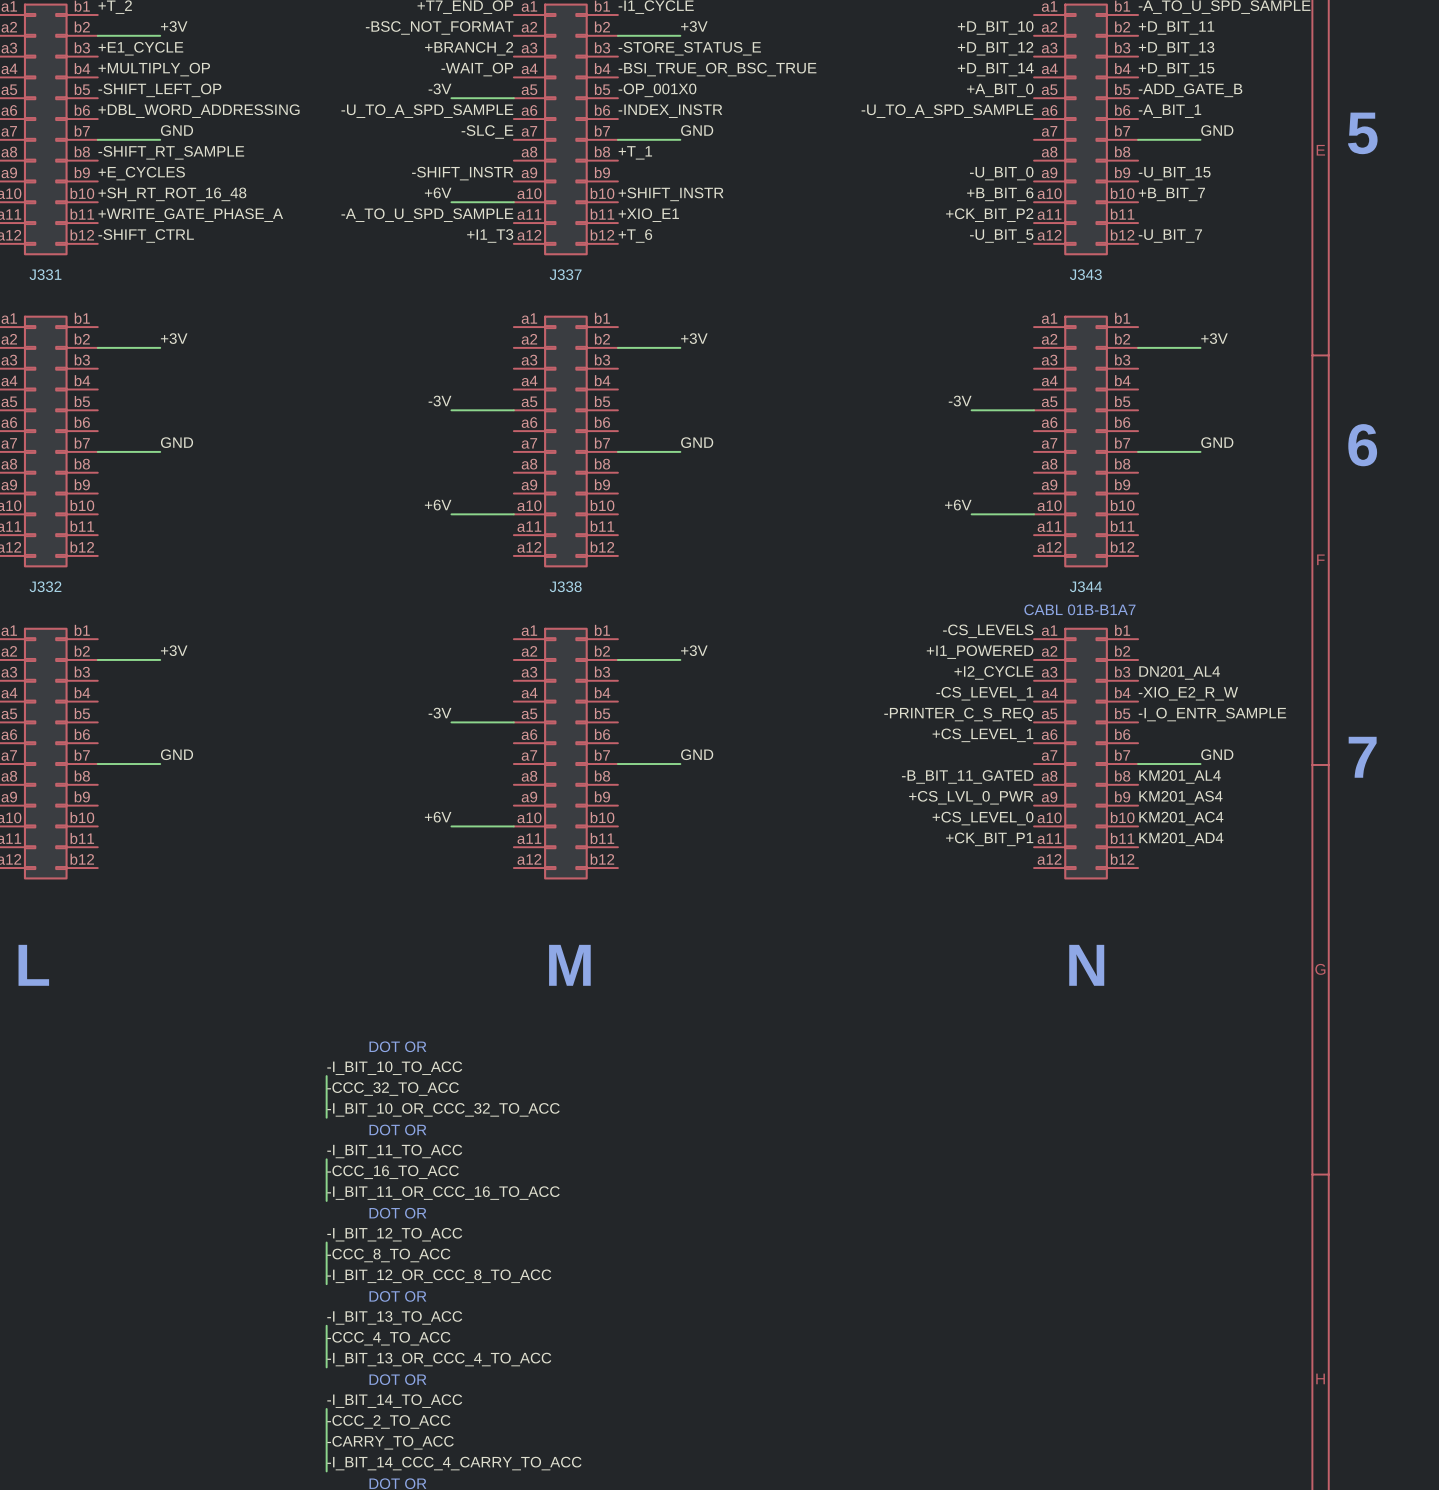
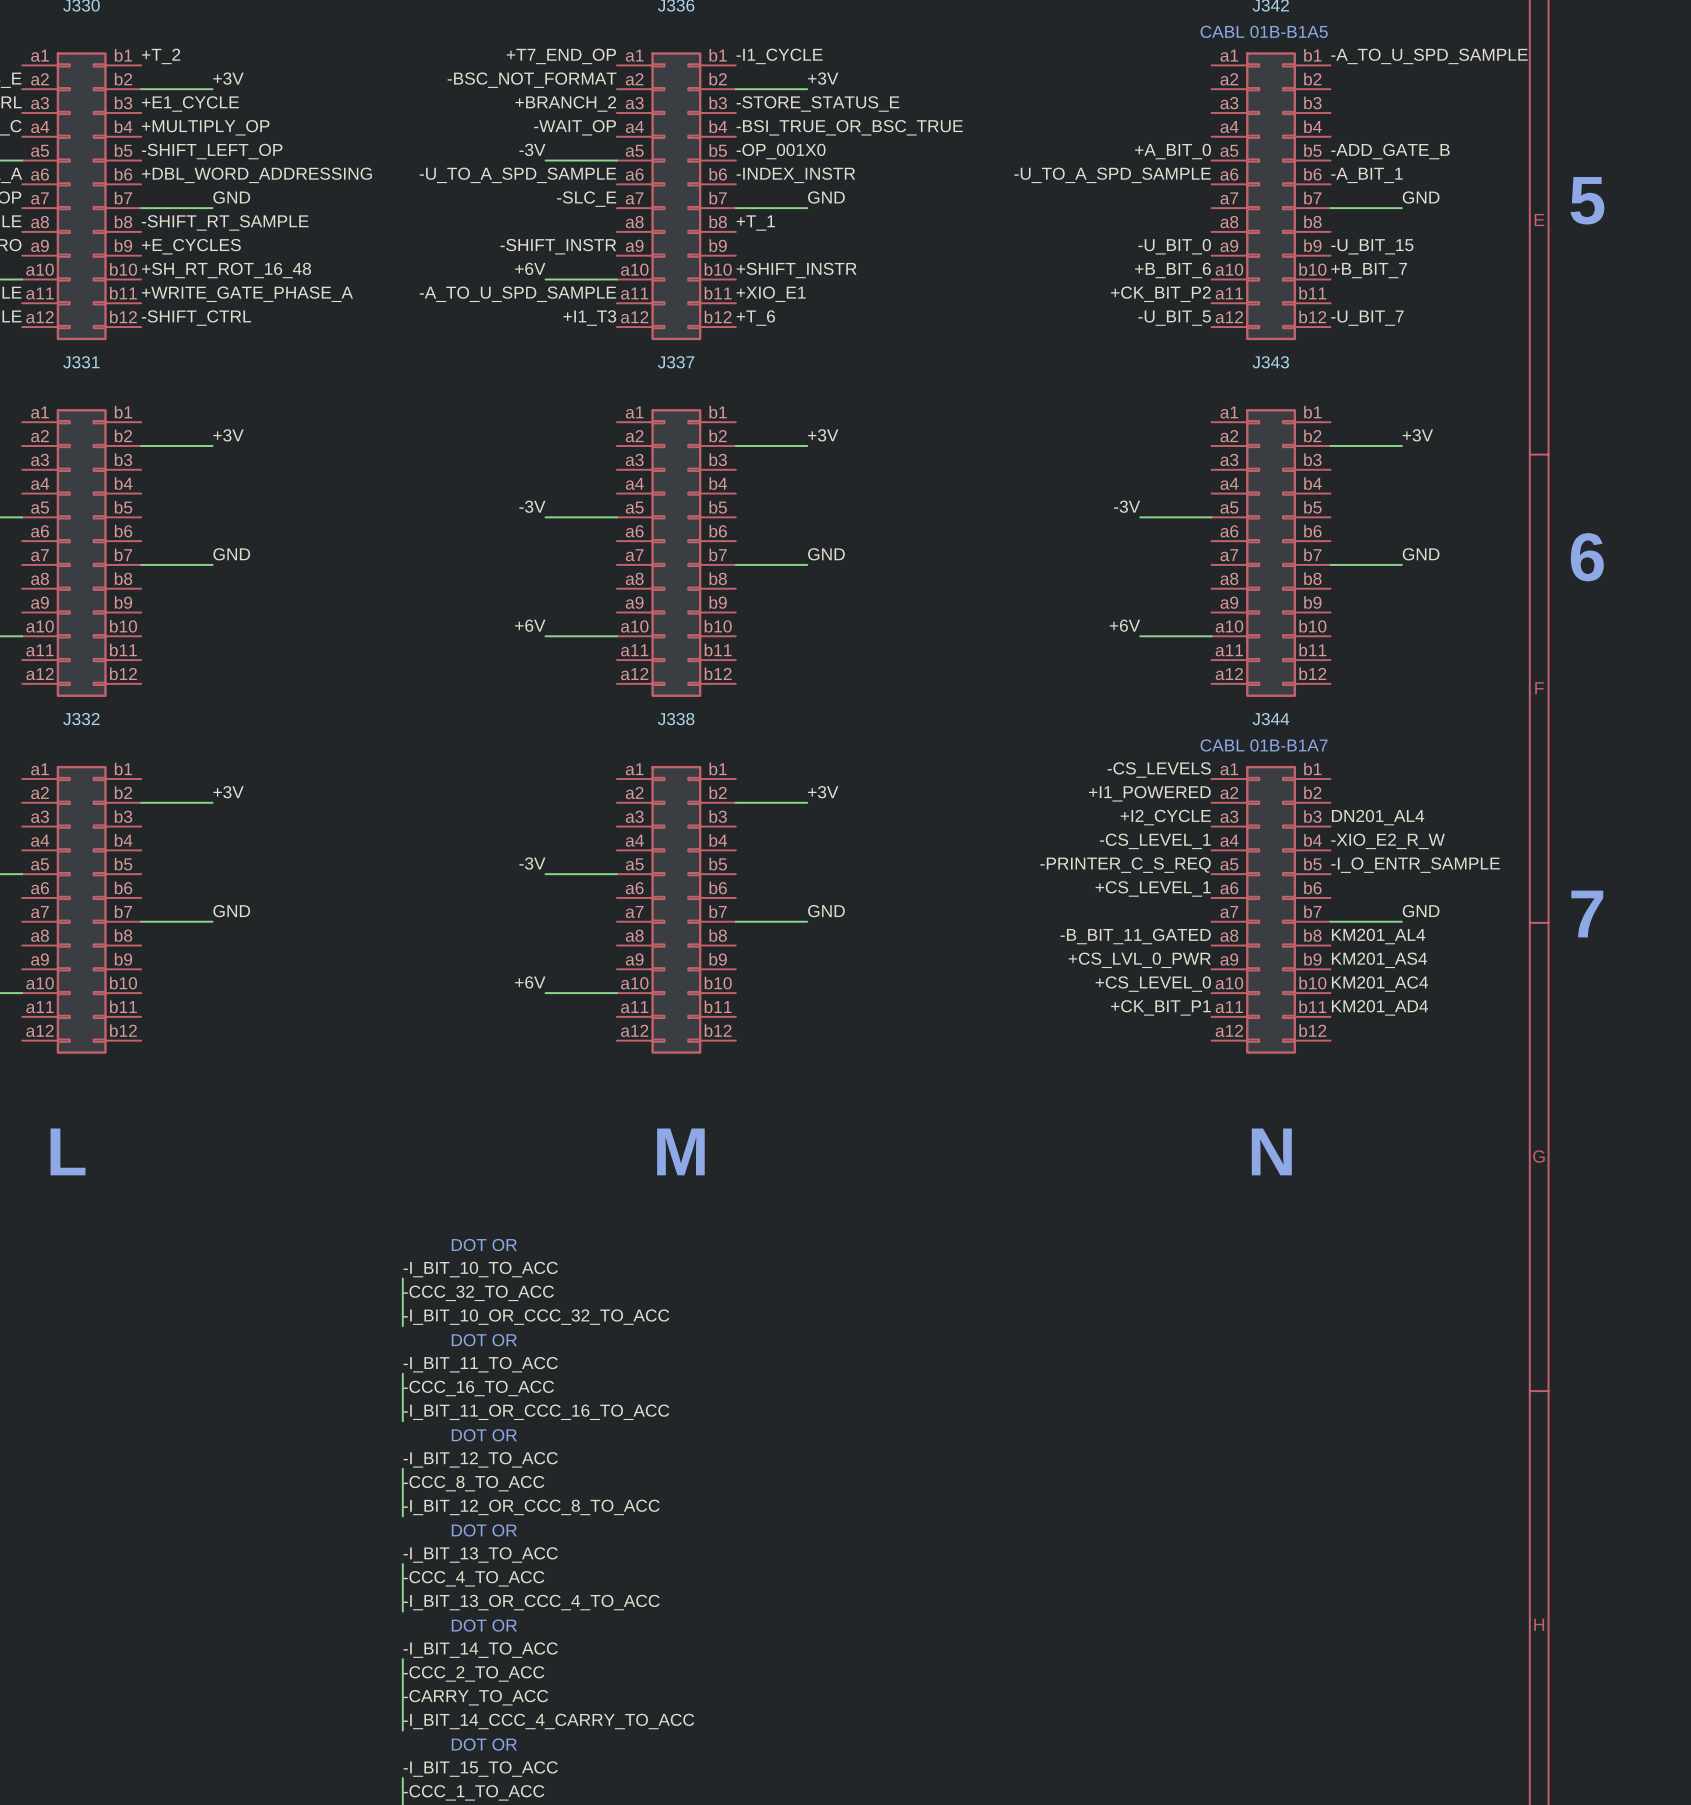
label: +D_BIT_10 (995, 27) -> none
label: +D_BIT_11 (1176, 28) -> none
label: +D_BIT_12 (995, 48) -> none
label: +D_BIT_13 (1176, 48) -> none
label: +D_BIT_14 (995, 69) -> none
label: +D_BIT_15 (1176, 69) -> none

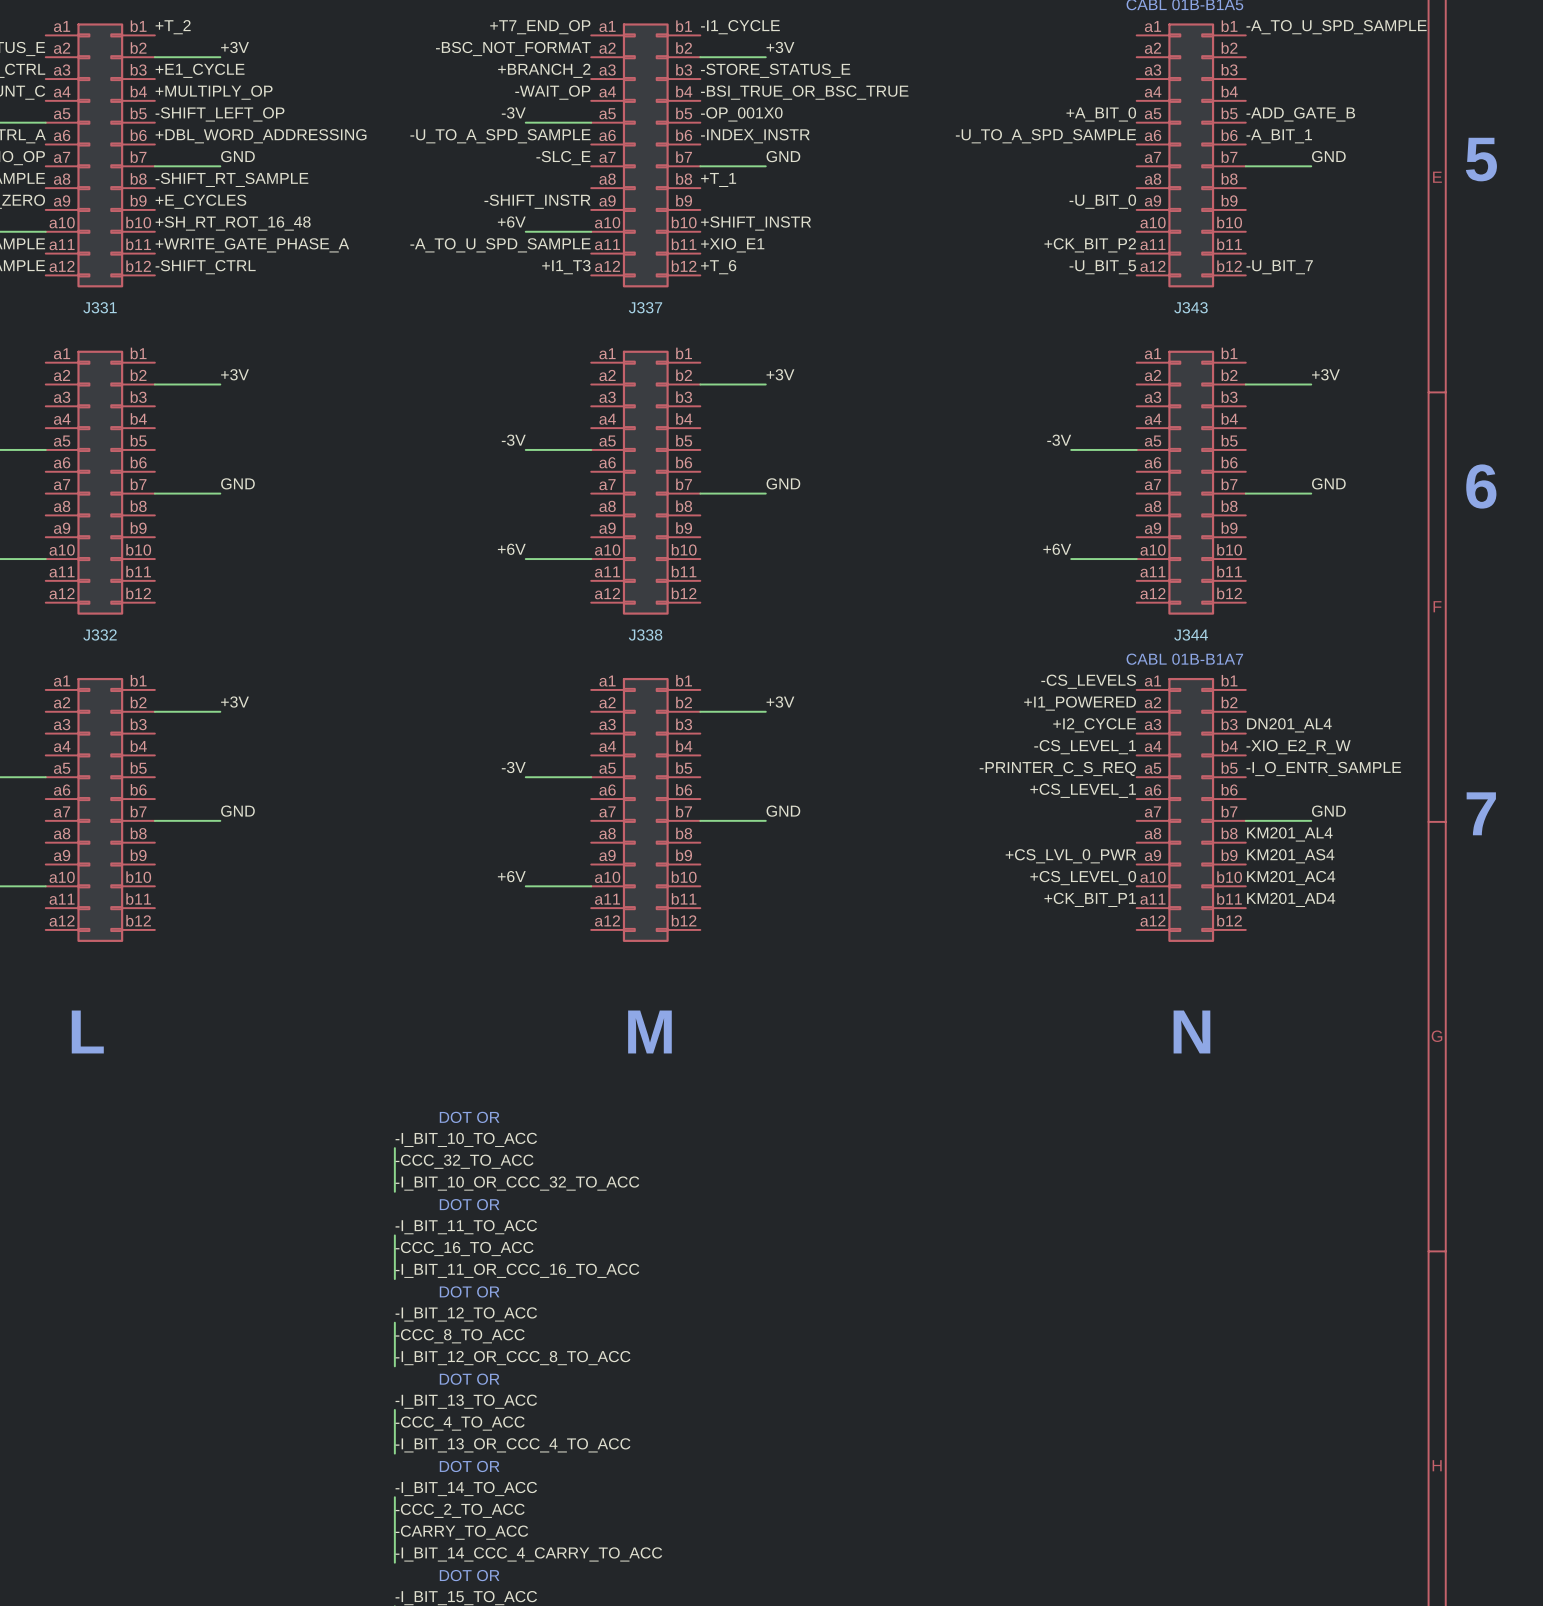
label: -U_BIT_15 (1372, 246) -> none
label: +B_BIT_6 (1172, 270) -> none
label: +B_BIT_7 (1369, 270) -> none
label: -B_BIT_11_GATED (1135, 936) -> none

